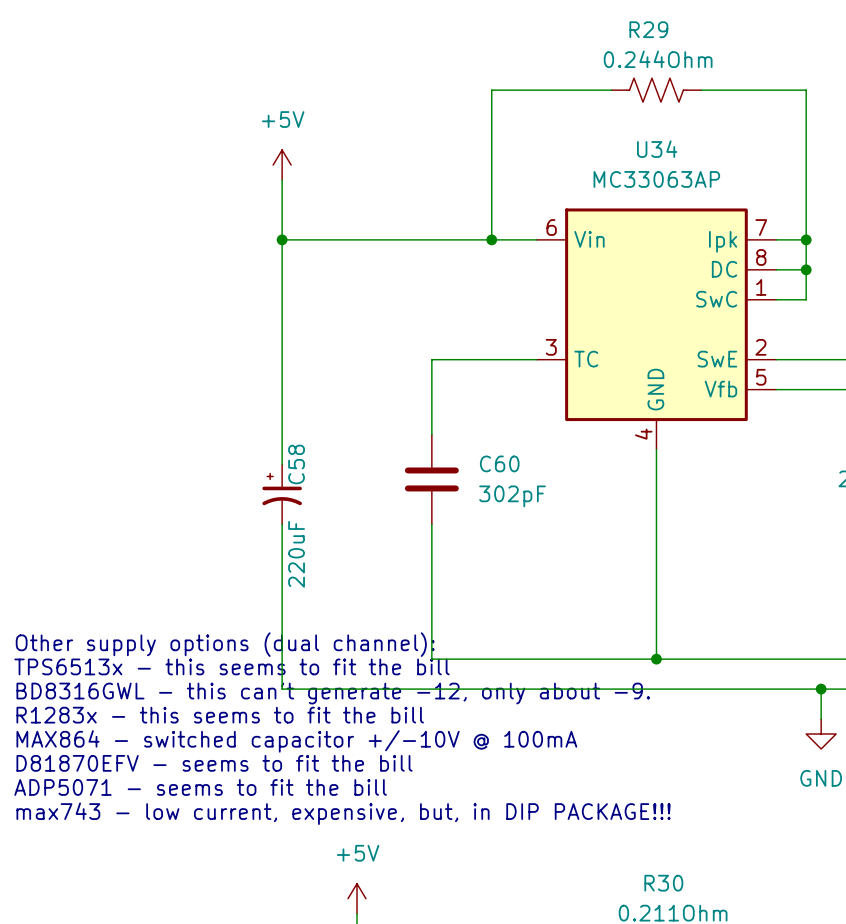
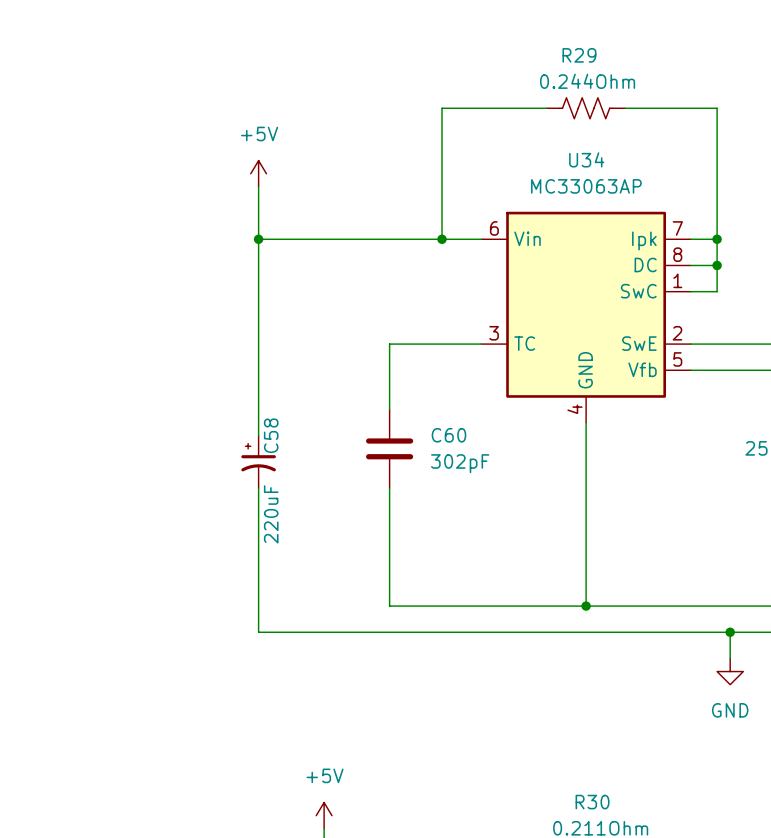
text: Other supply options (dual channel): (225, 644) -> none
text: TPS6513x - this seems to fit the bill (231, 666) -> none
text: BD8316GWL - this can't generate -12, only about -9. (333, 693) -> none
text: R1283x - this seems to fit the bill (220, 715) -> none
text: MAX864 - switched capacitor +/-10V @ 100mA (296, 741) -> none
text: D81870EFV - seems to fit the bill (214, 763) -> none
text: ADP5071 - seems to fit the bill (200, 787) -> none
text: max743 - low current, expensive, but, in DIP PACKAGE!!! (343, 813) -> none

